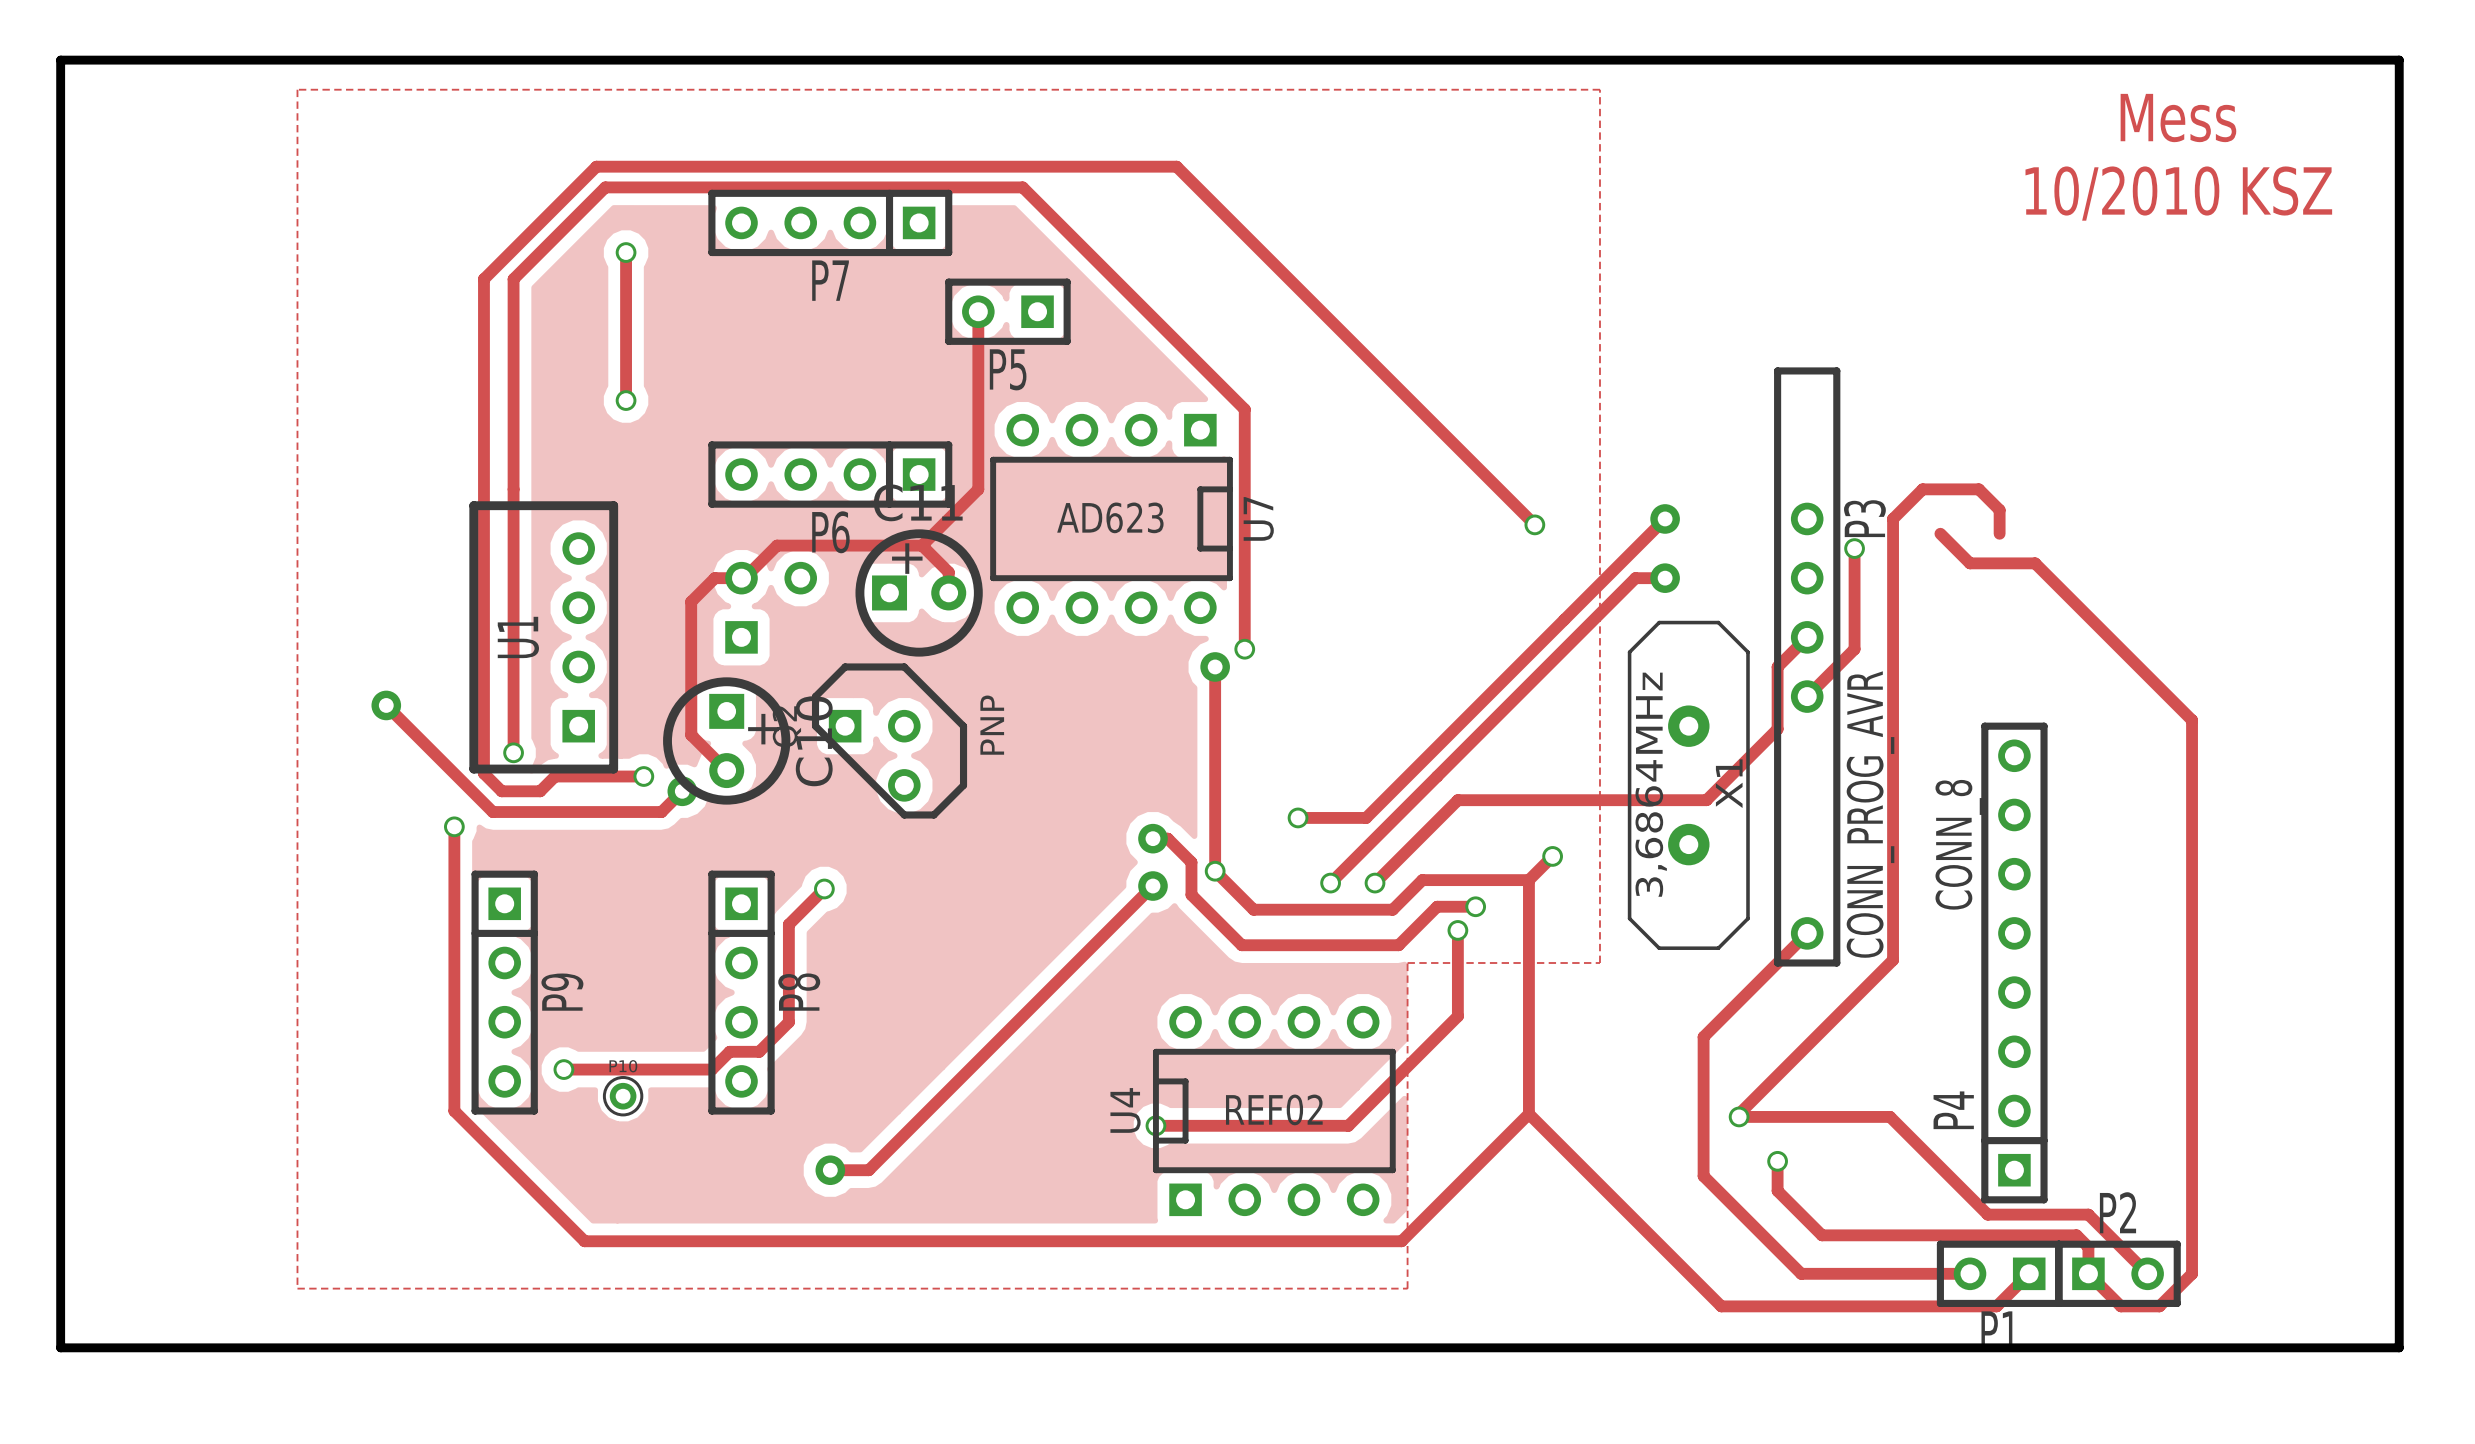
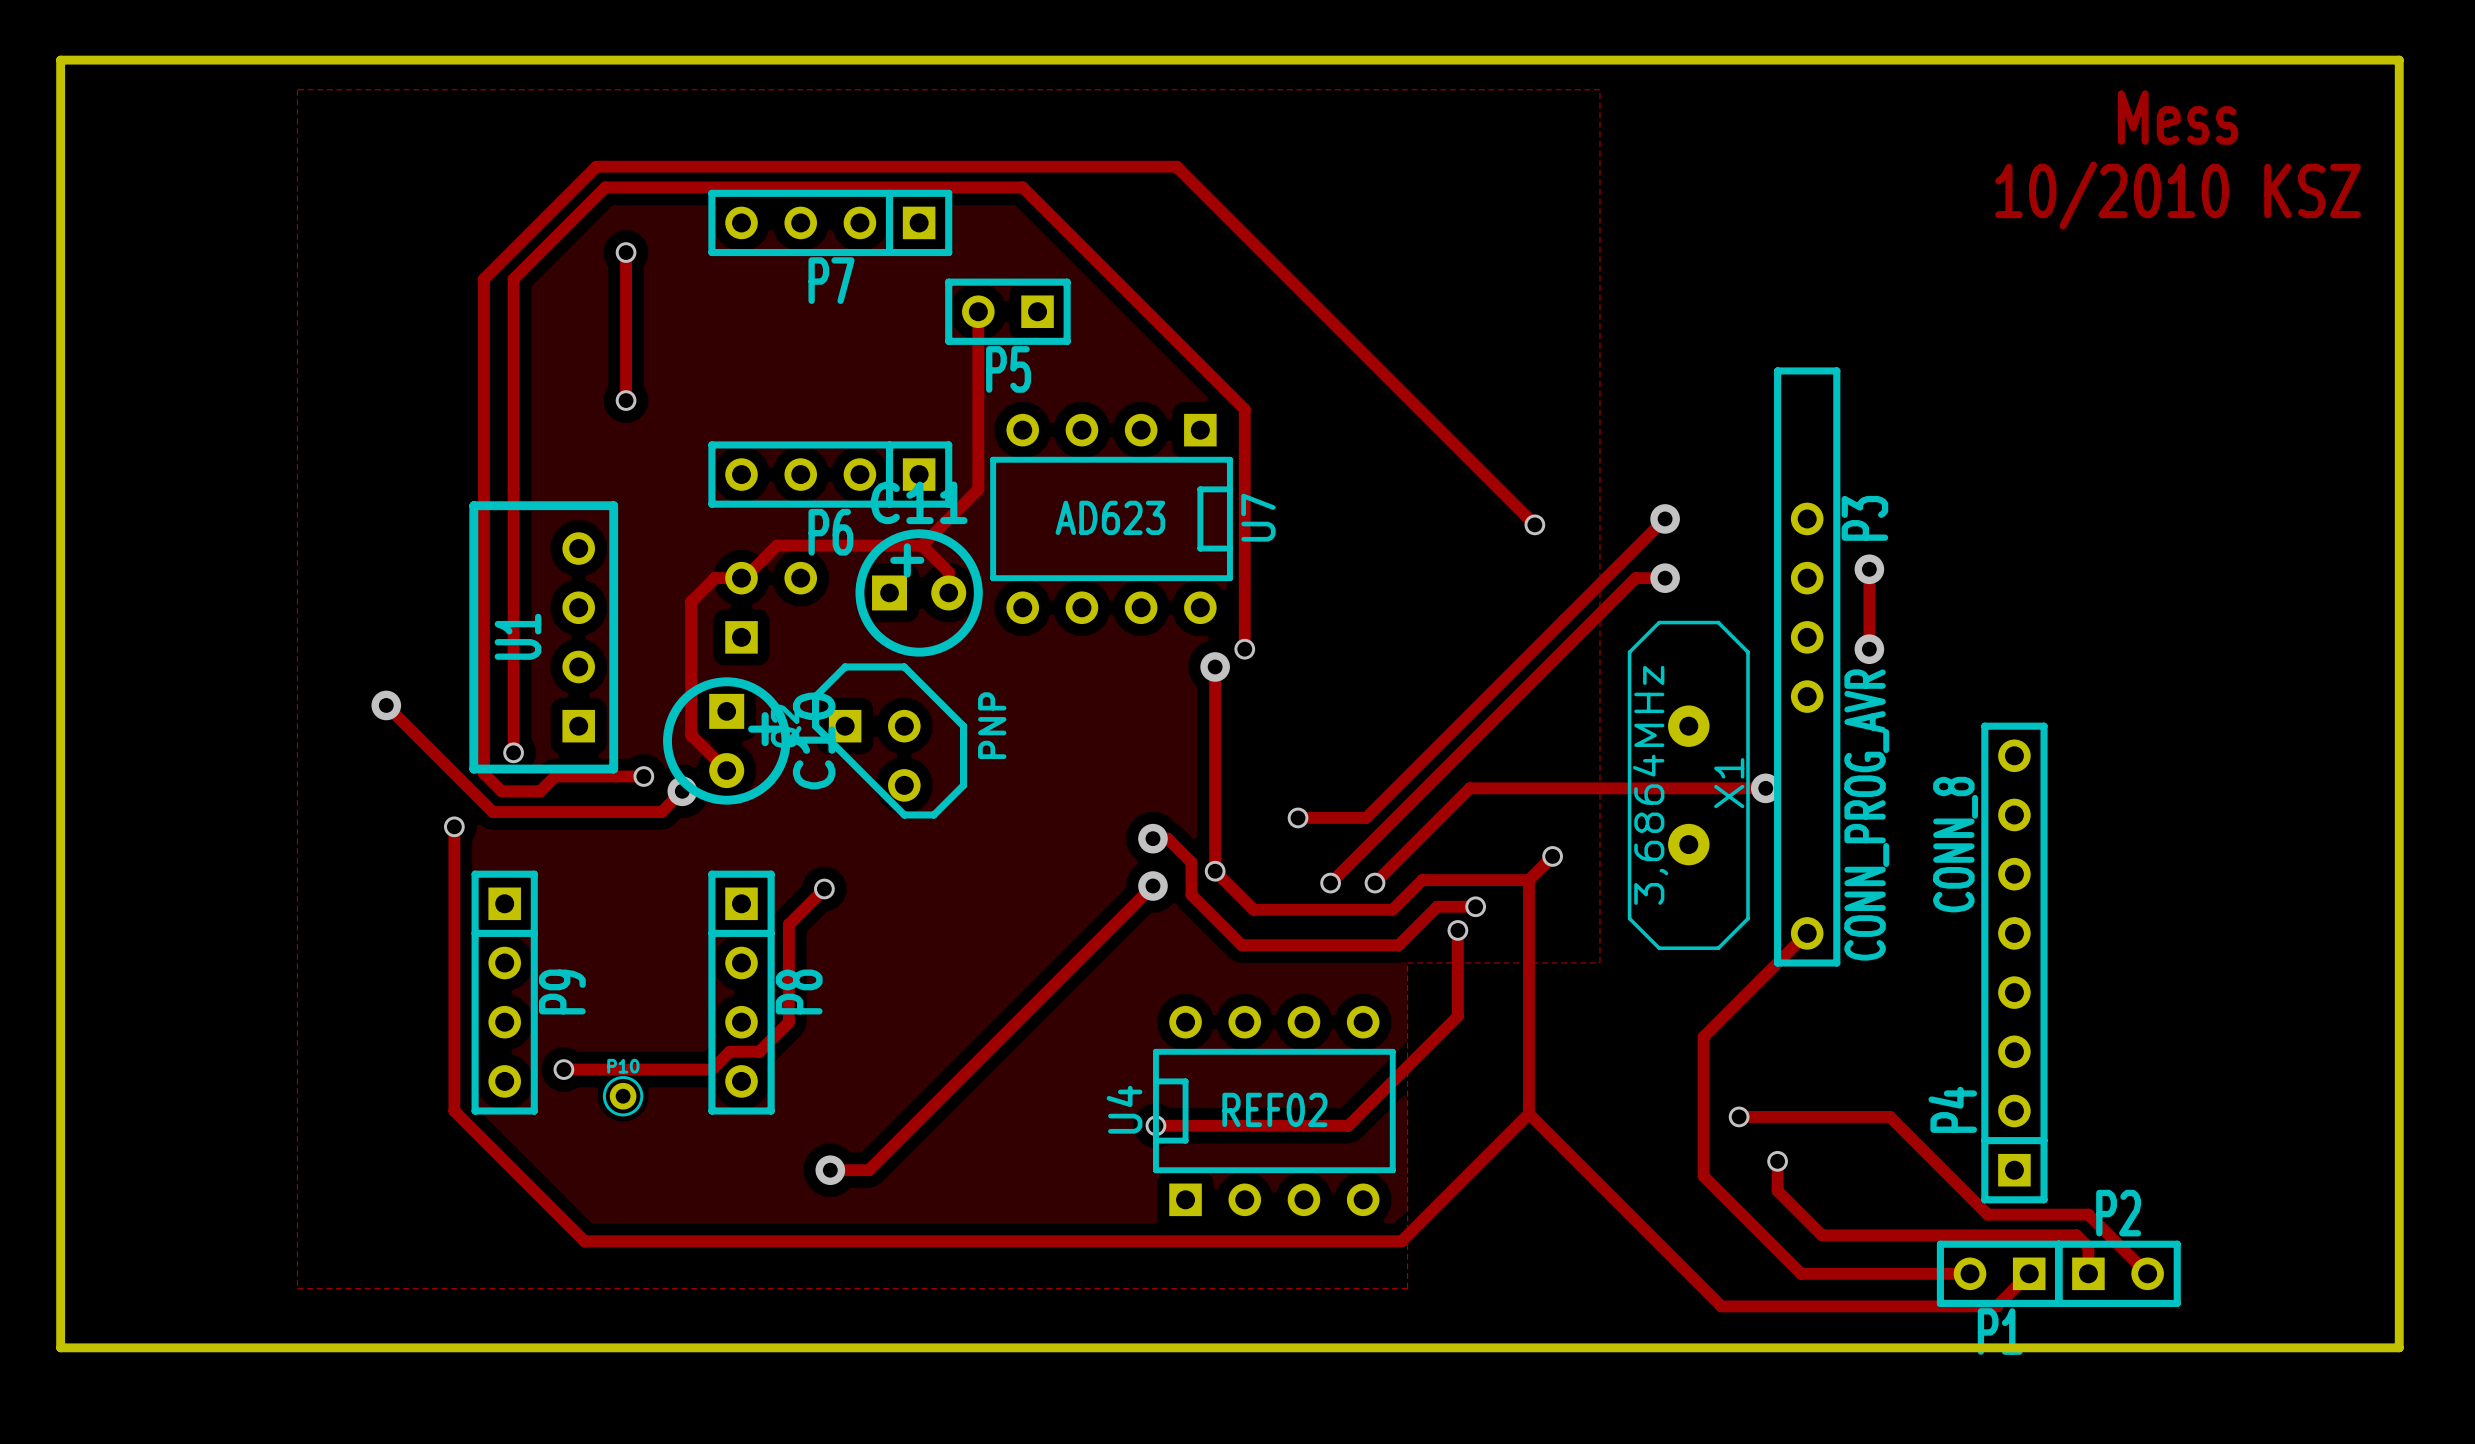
track: (1940, 533) (1970, 563) (2035, 563) (2192, 720) (2192, 1273) (2159, 1306) (2120, 1306) (2088, 1273) -> none
track: (1999, 533) (1999, 510) (1978, 489) (1922, 489) (1893, 518) (1893, 960) (1739, 1113) (1739, 1116) -> none
track: (1854, 548) (1854, 649) (1807, 696) -> none
via: (1854, 548) -> none
track: none -> (1869, 569) (1869, 649)
via: none -> (1869, 569)
track: (1807, 637) (1777, 666) (1777, 729) (1706, 800) (1457, 800) -> (1765, 788) (1469, 788) (1457, 800)
via: none -> (1869, 649)
via: none -> (1765, 788)

